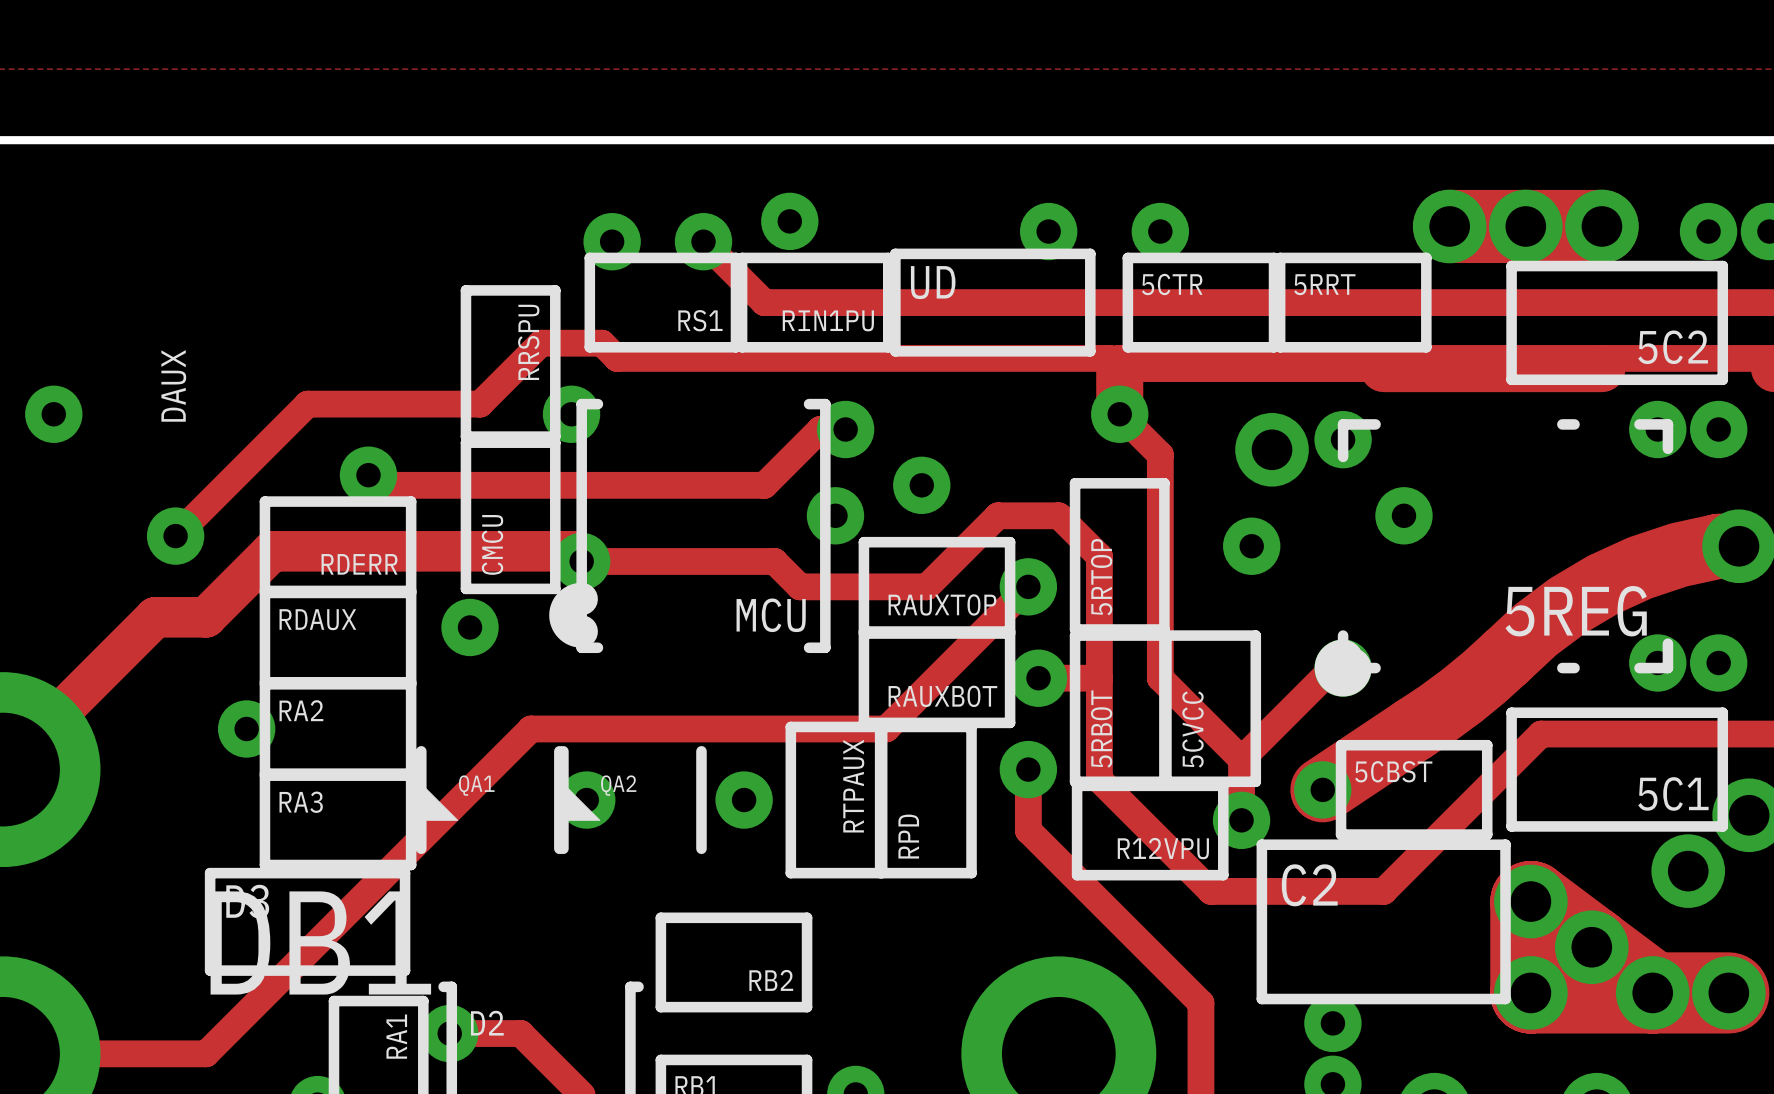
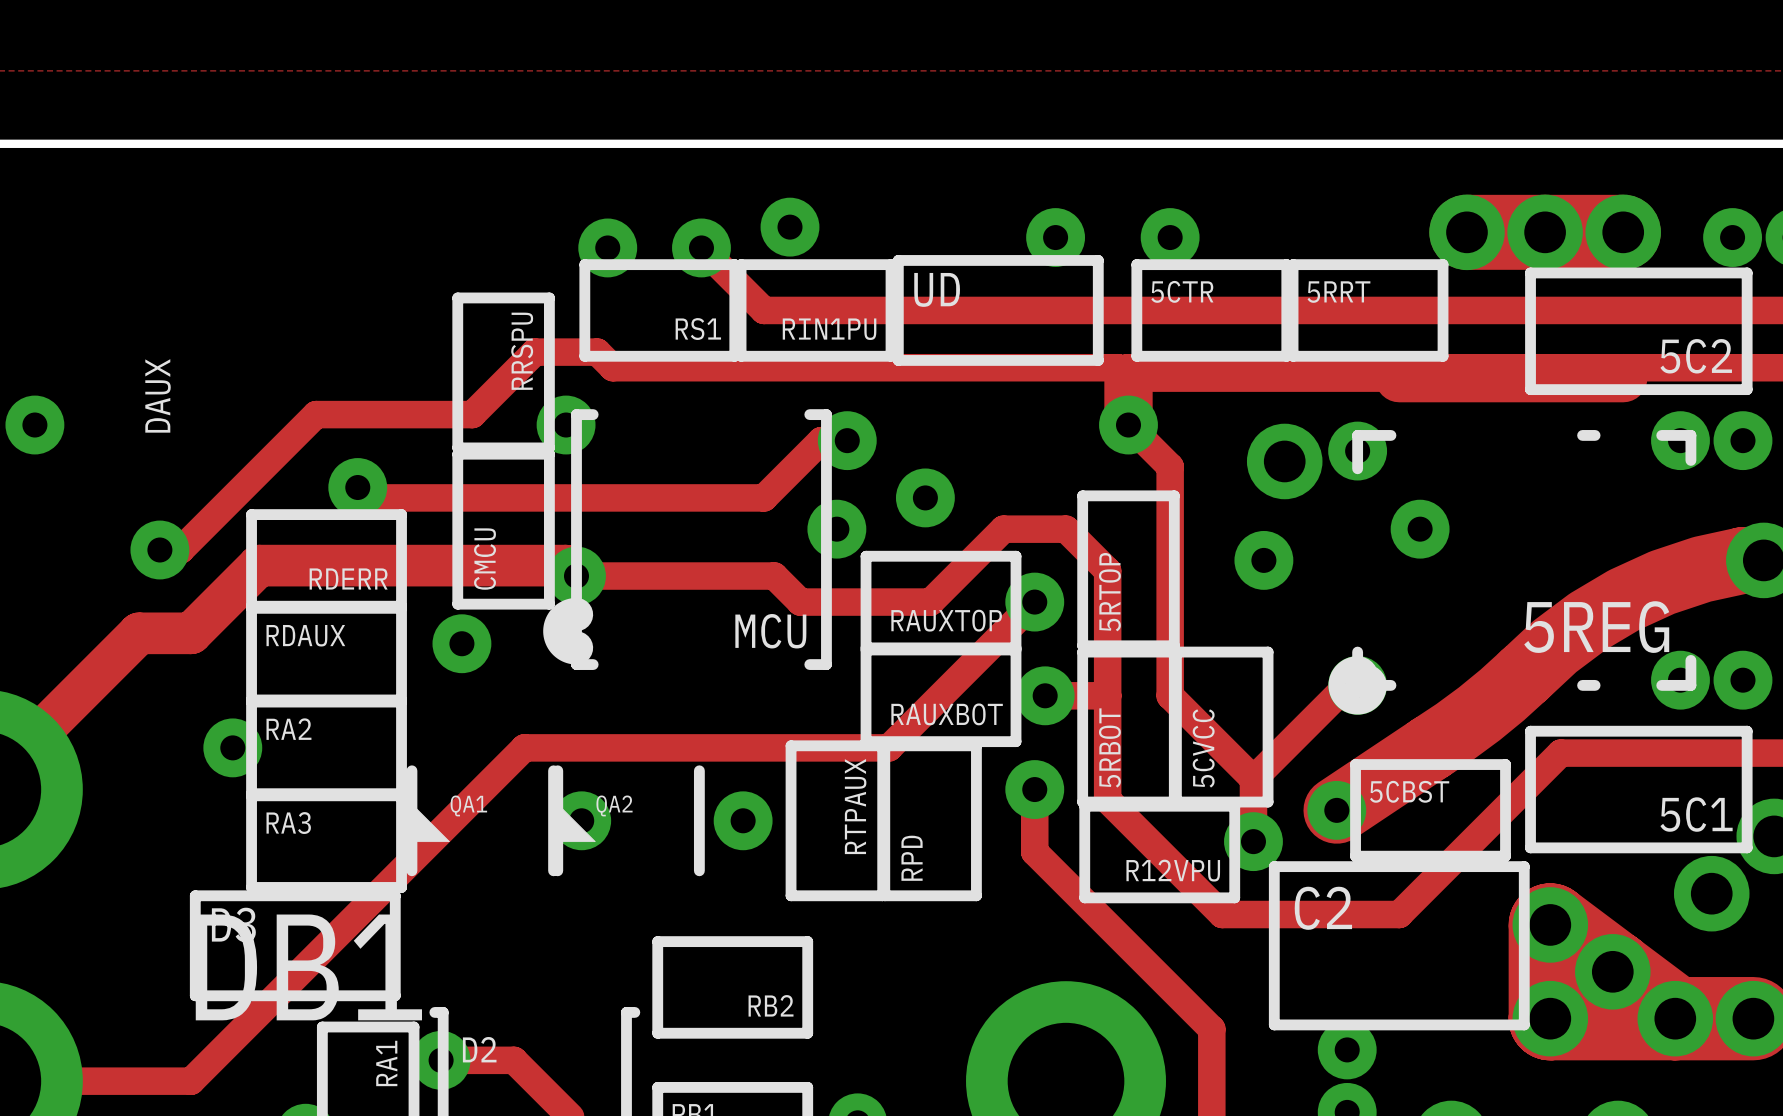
track: (327, 404) (307, 404) (175, 536) -> (316, 414) (180, 550) (159, 550)

